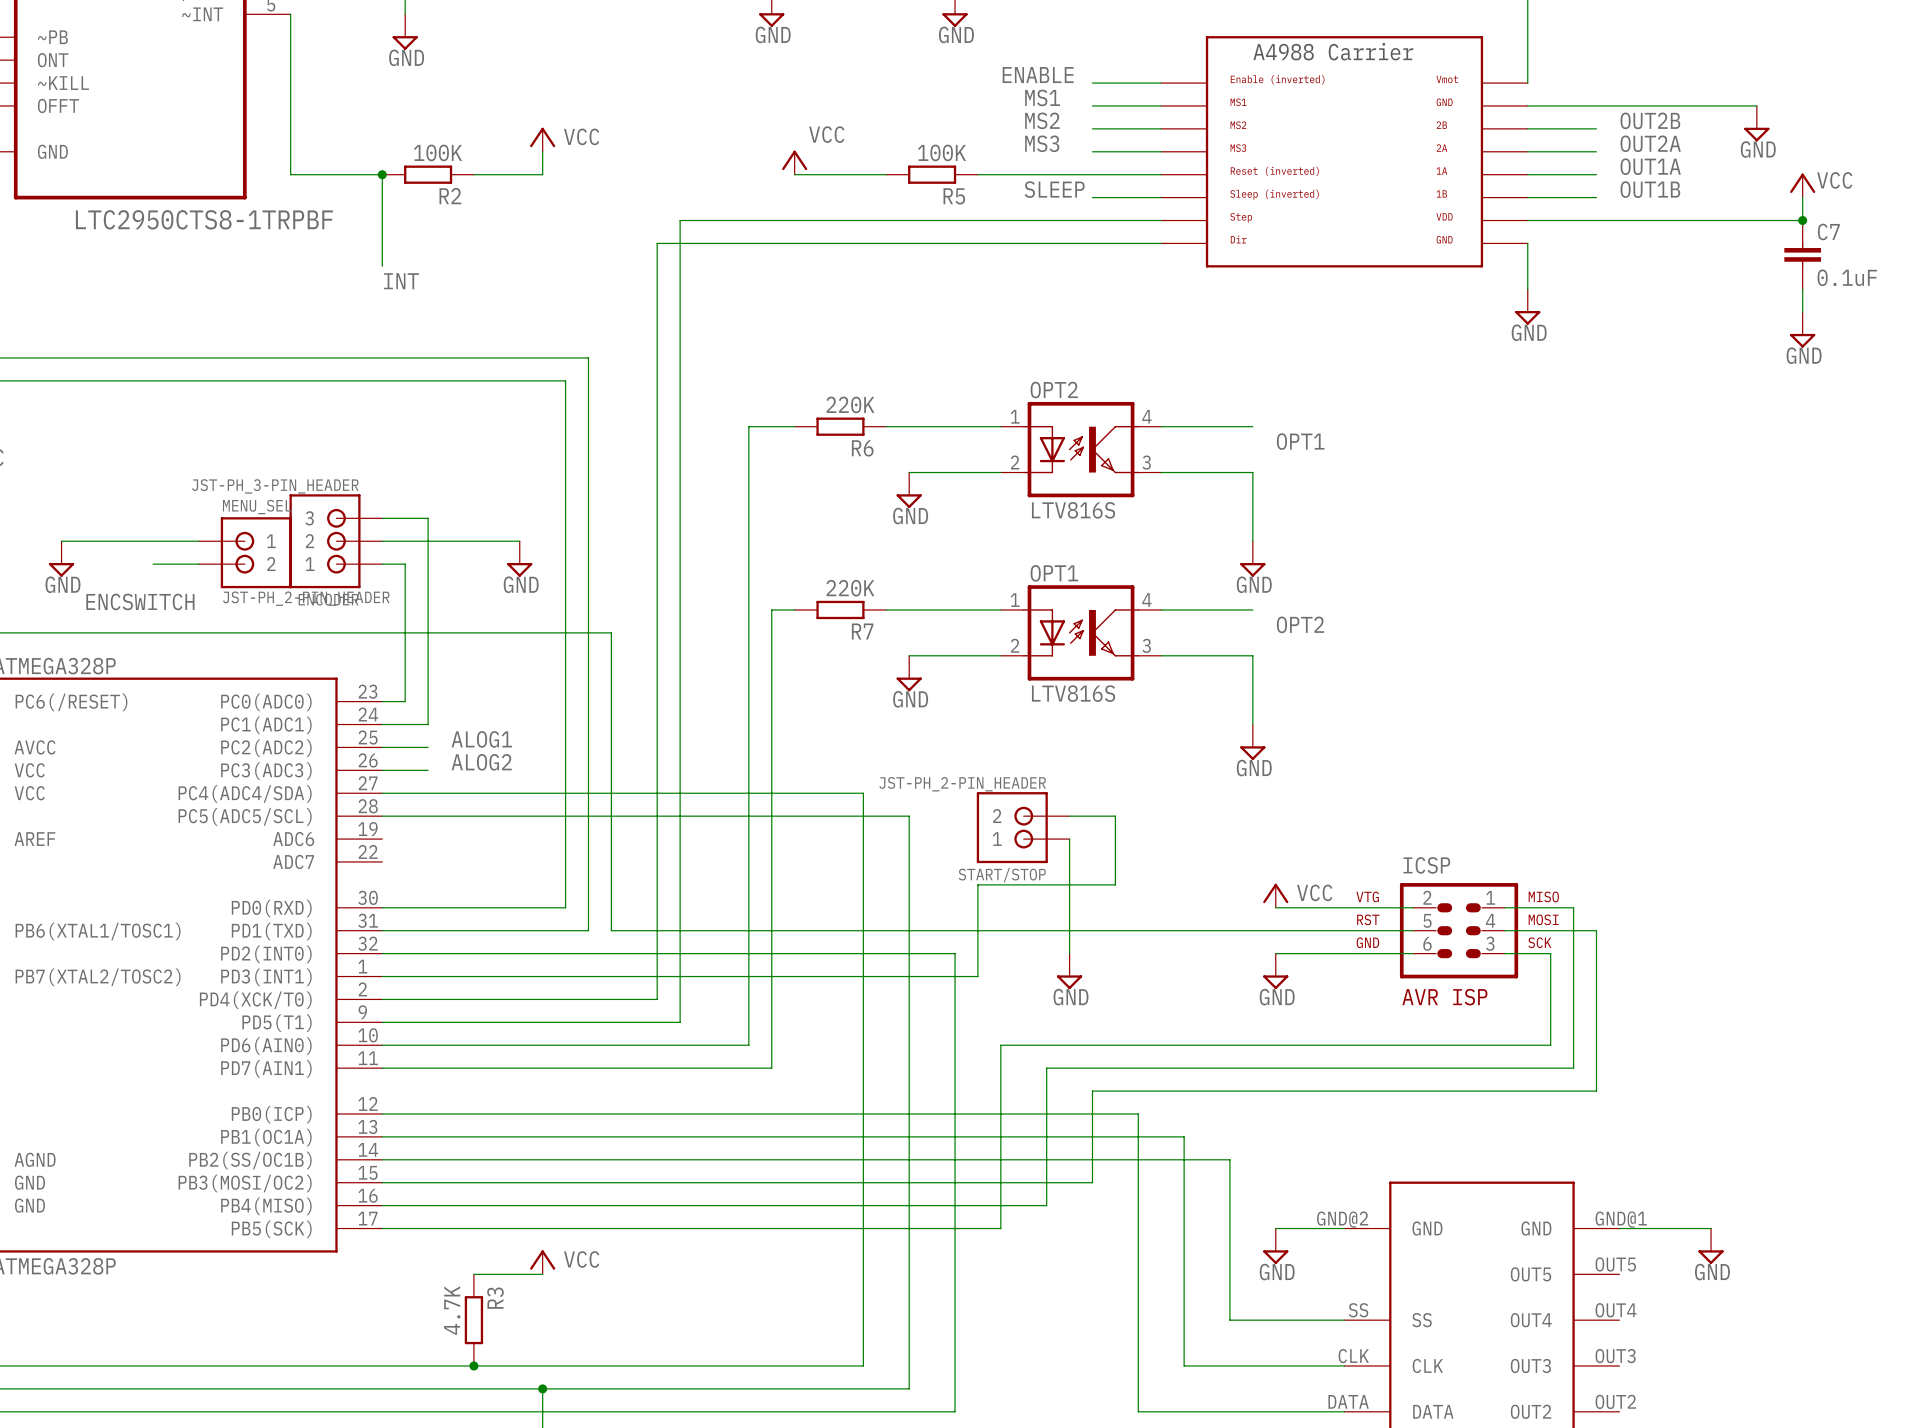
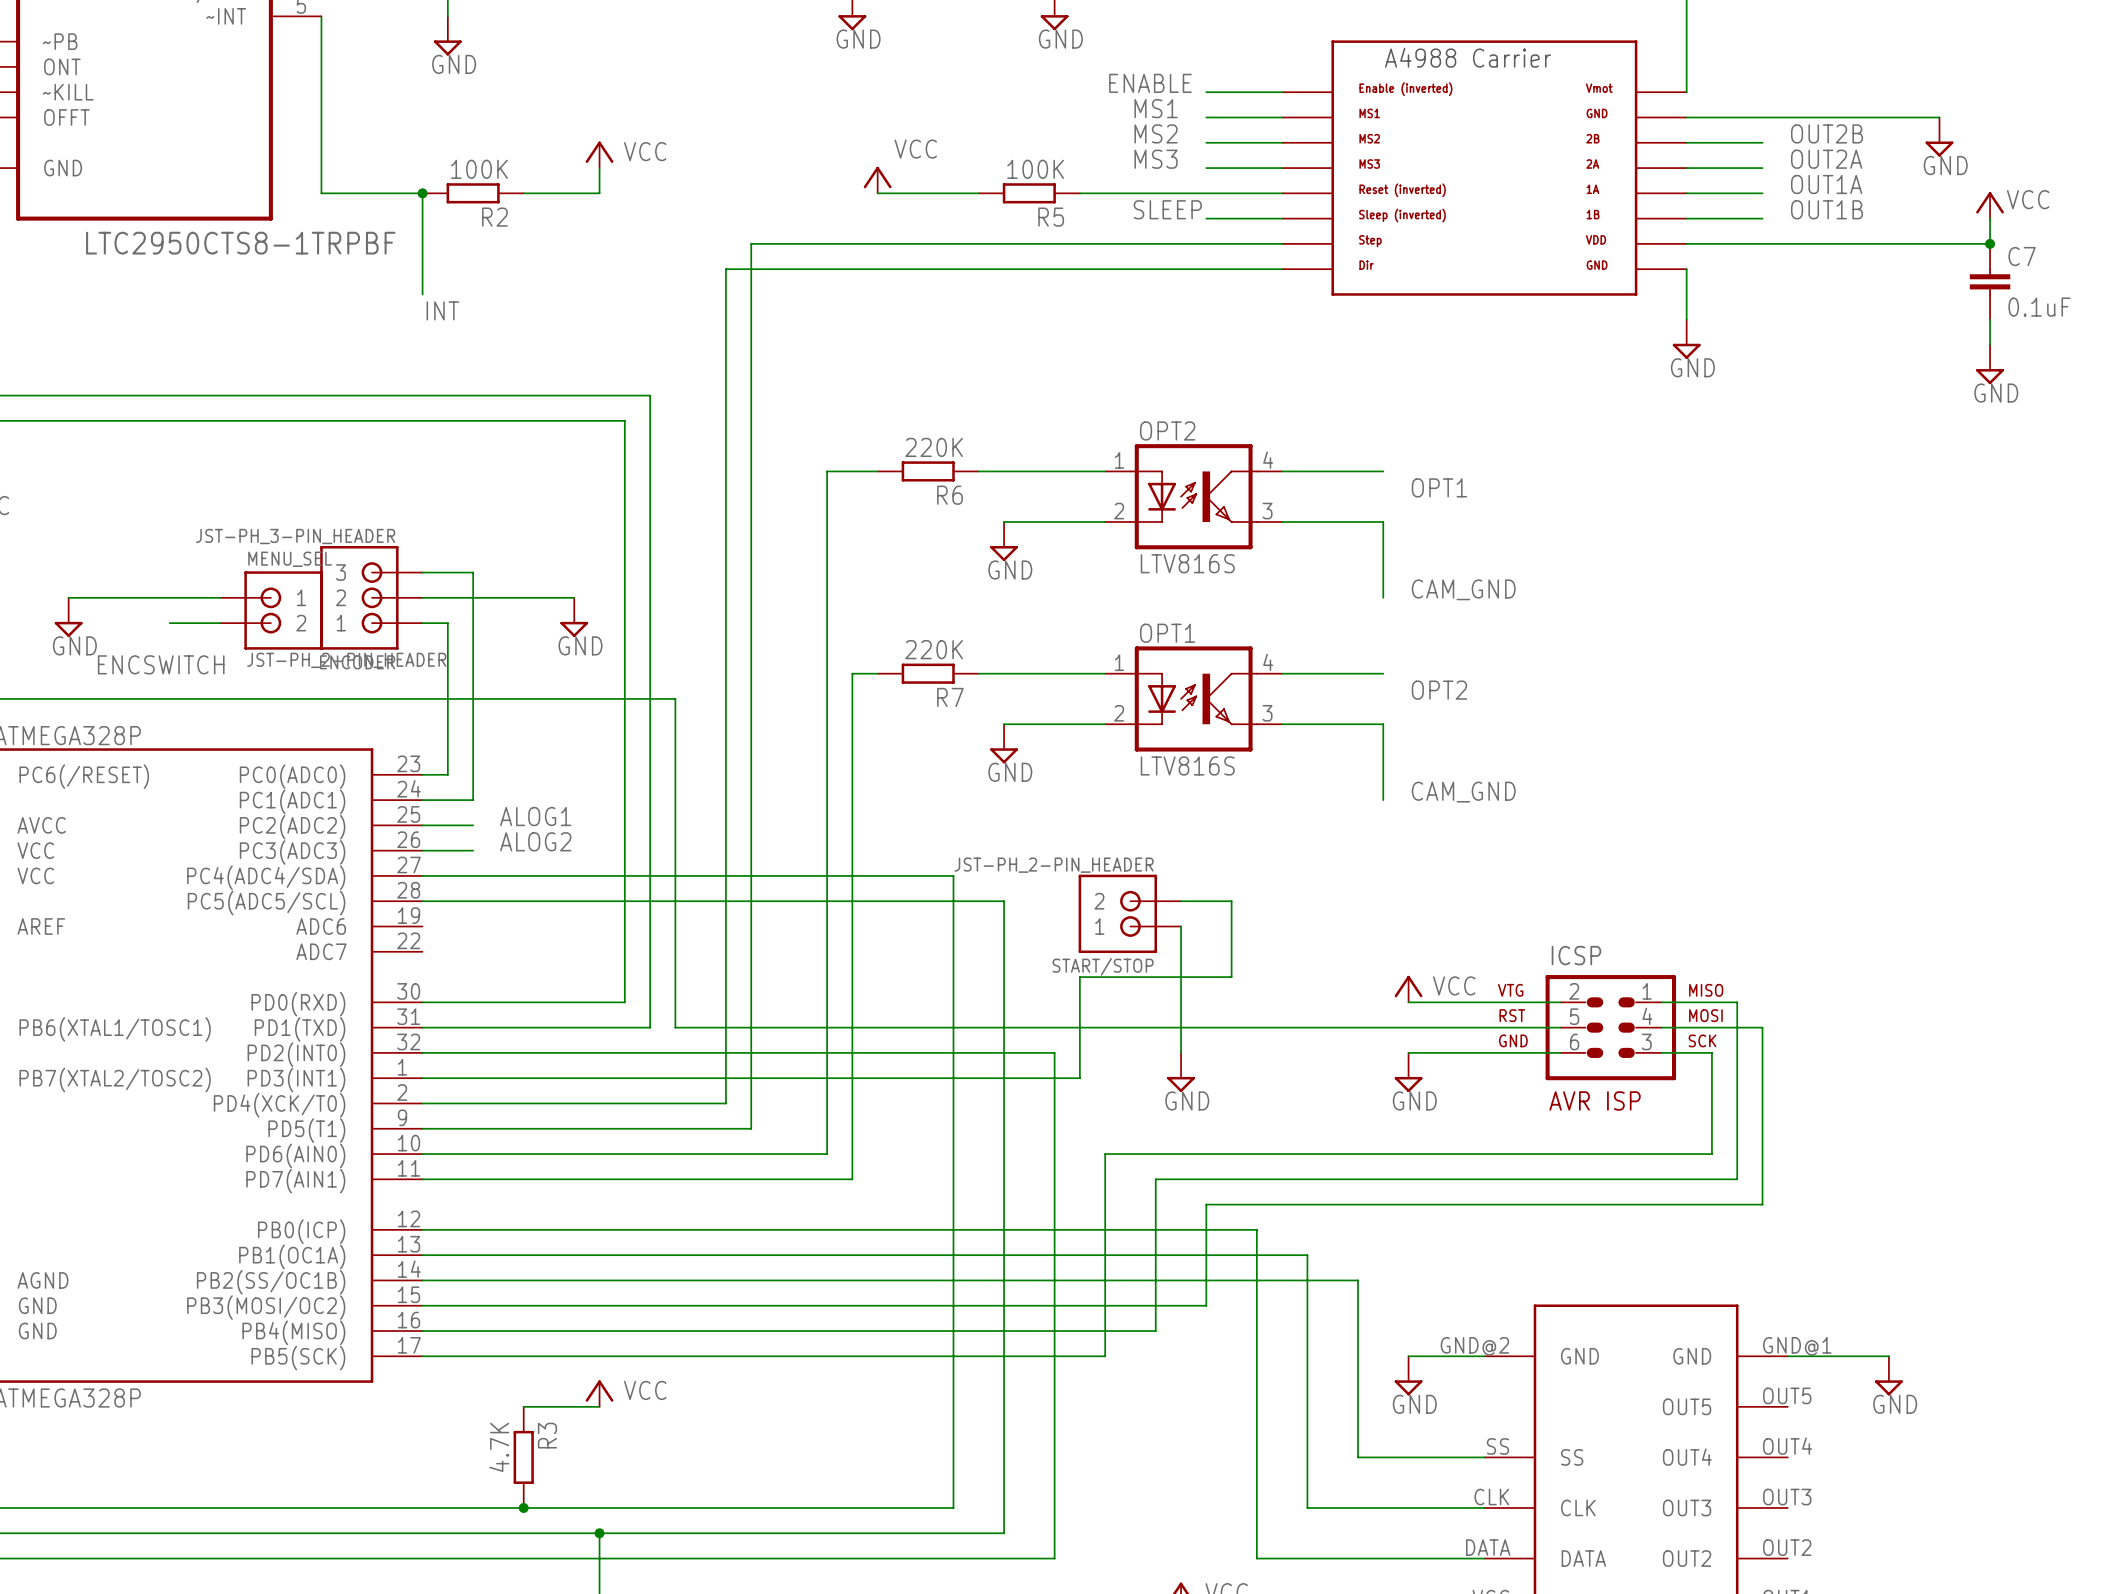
label: none -> CAM_GND (1463, 589)
power symbol: GND (1252, 559) -> none
label: none -> CAM_GND (1463, 792)
power symbol: GND (1252, 742) -> none

